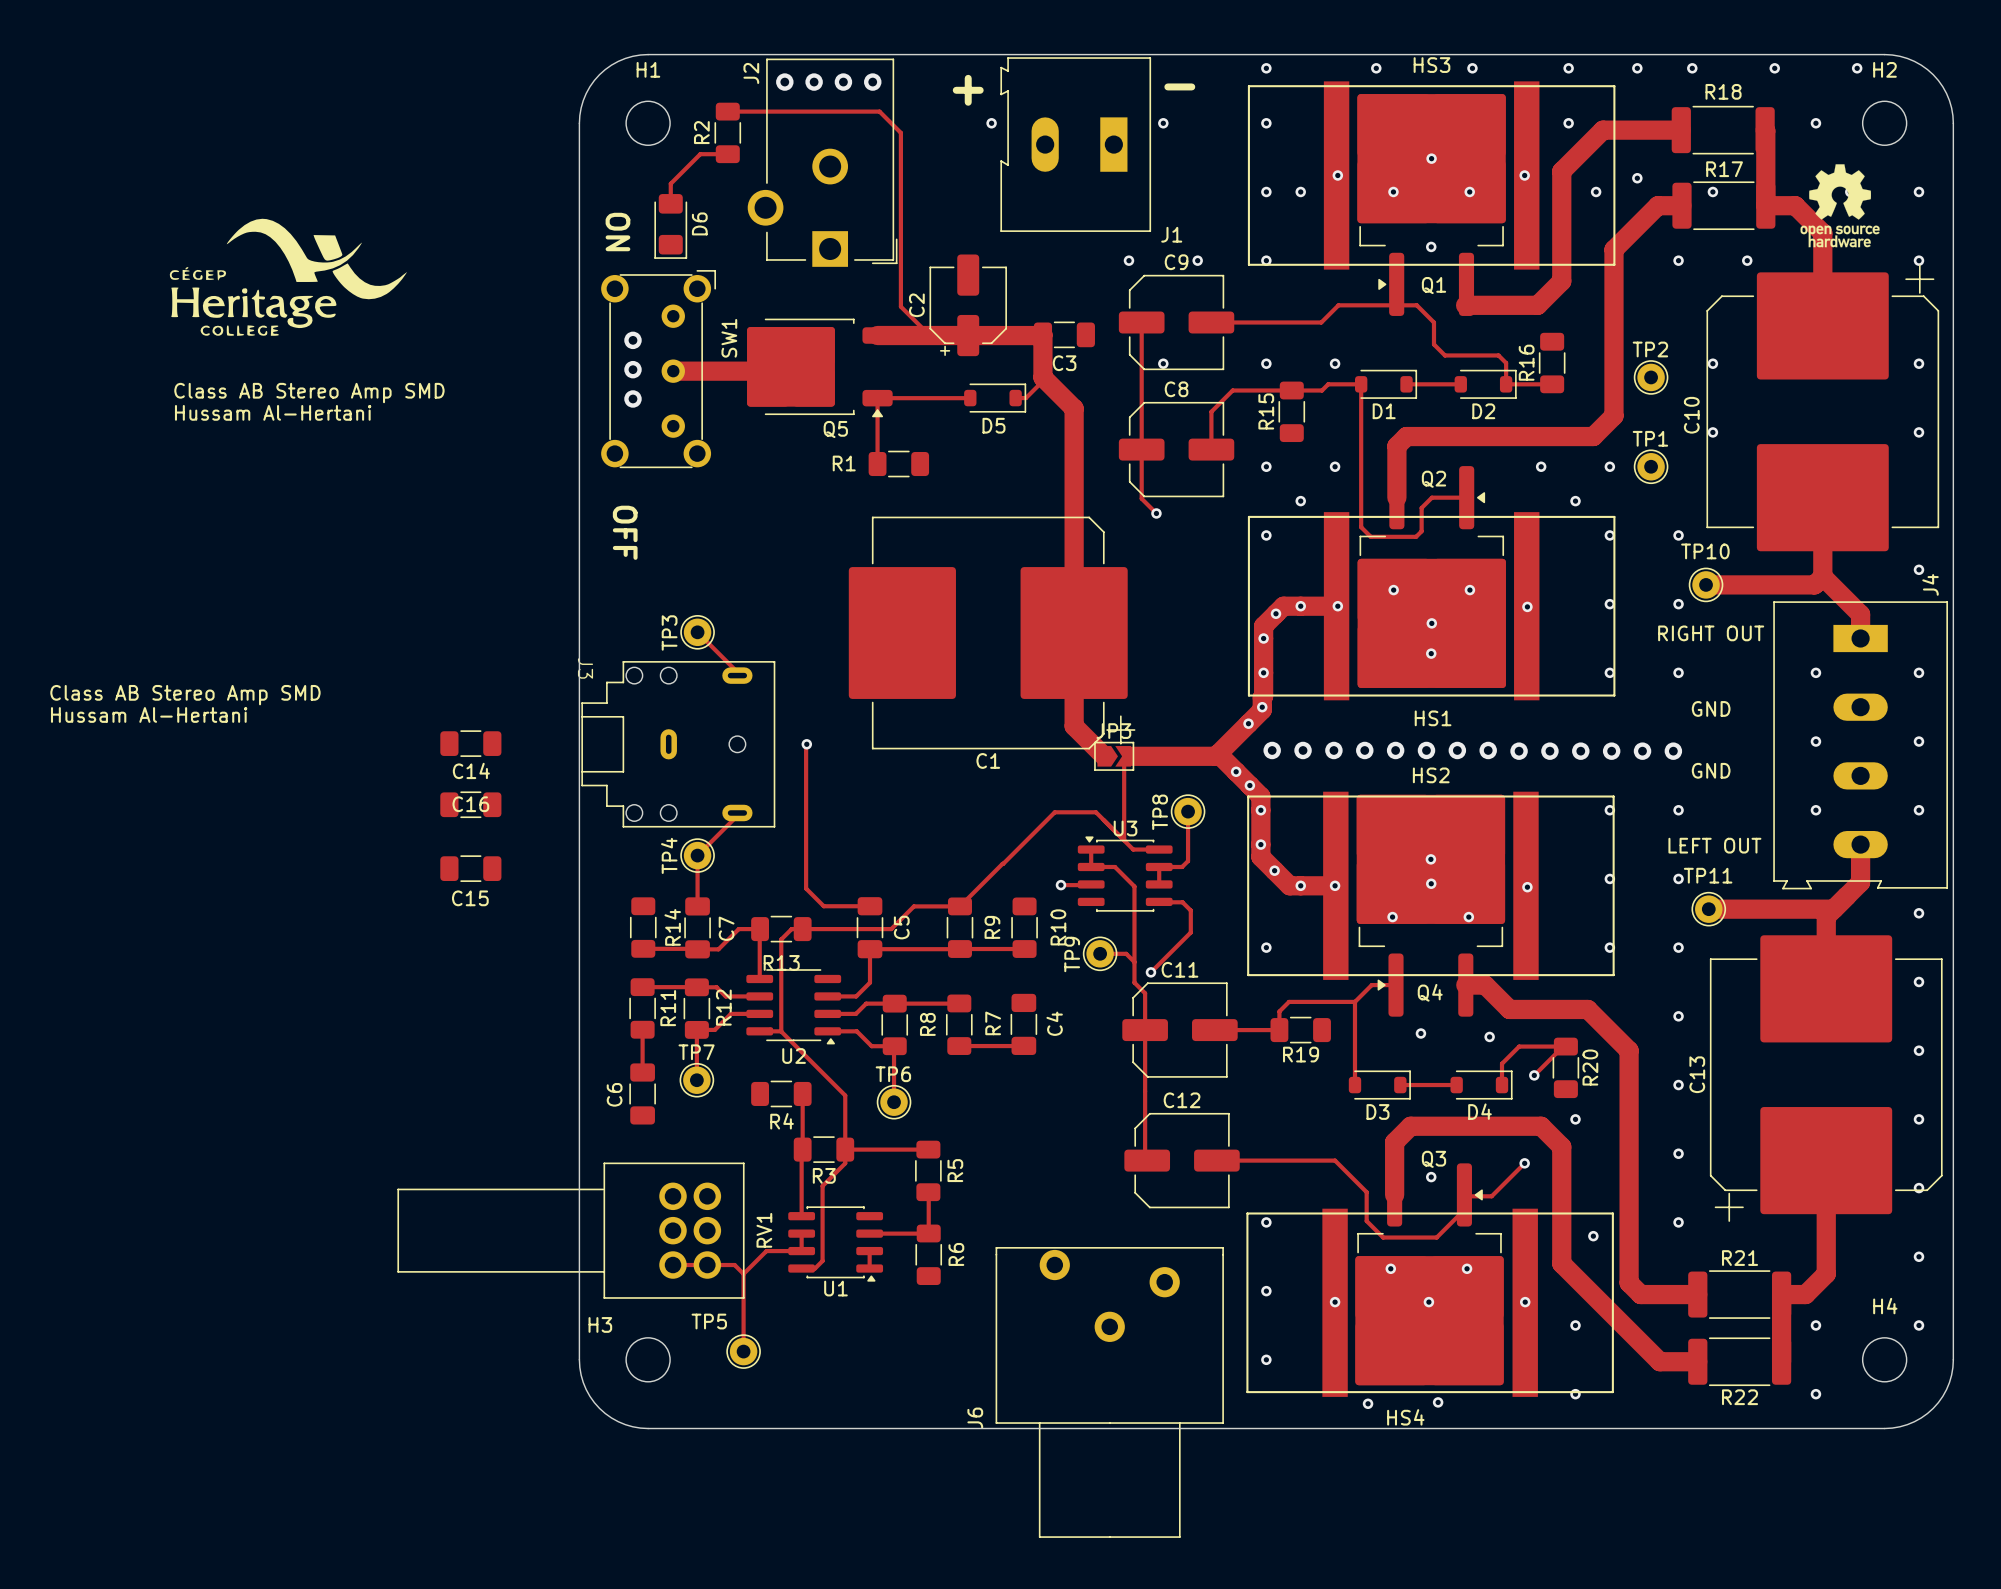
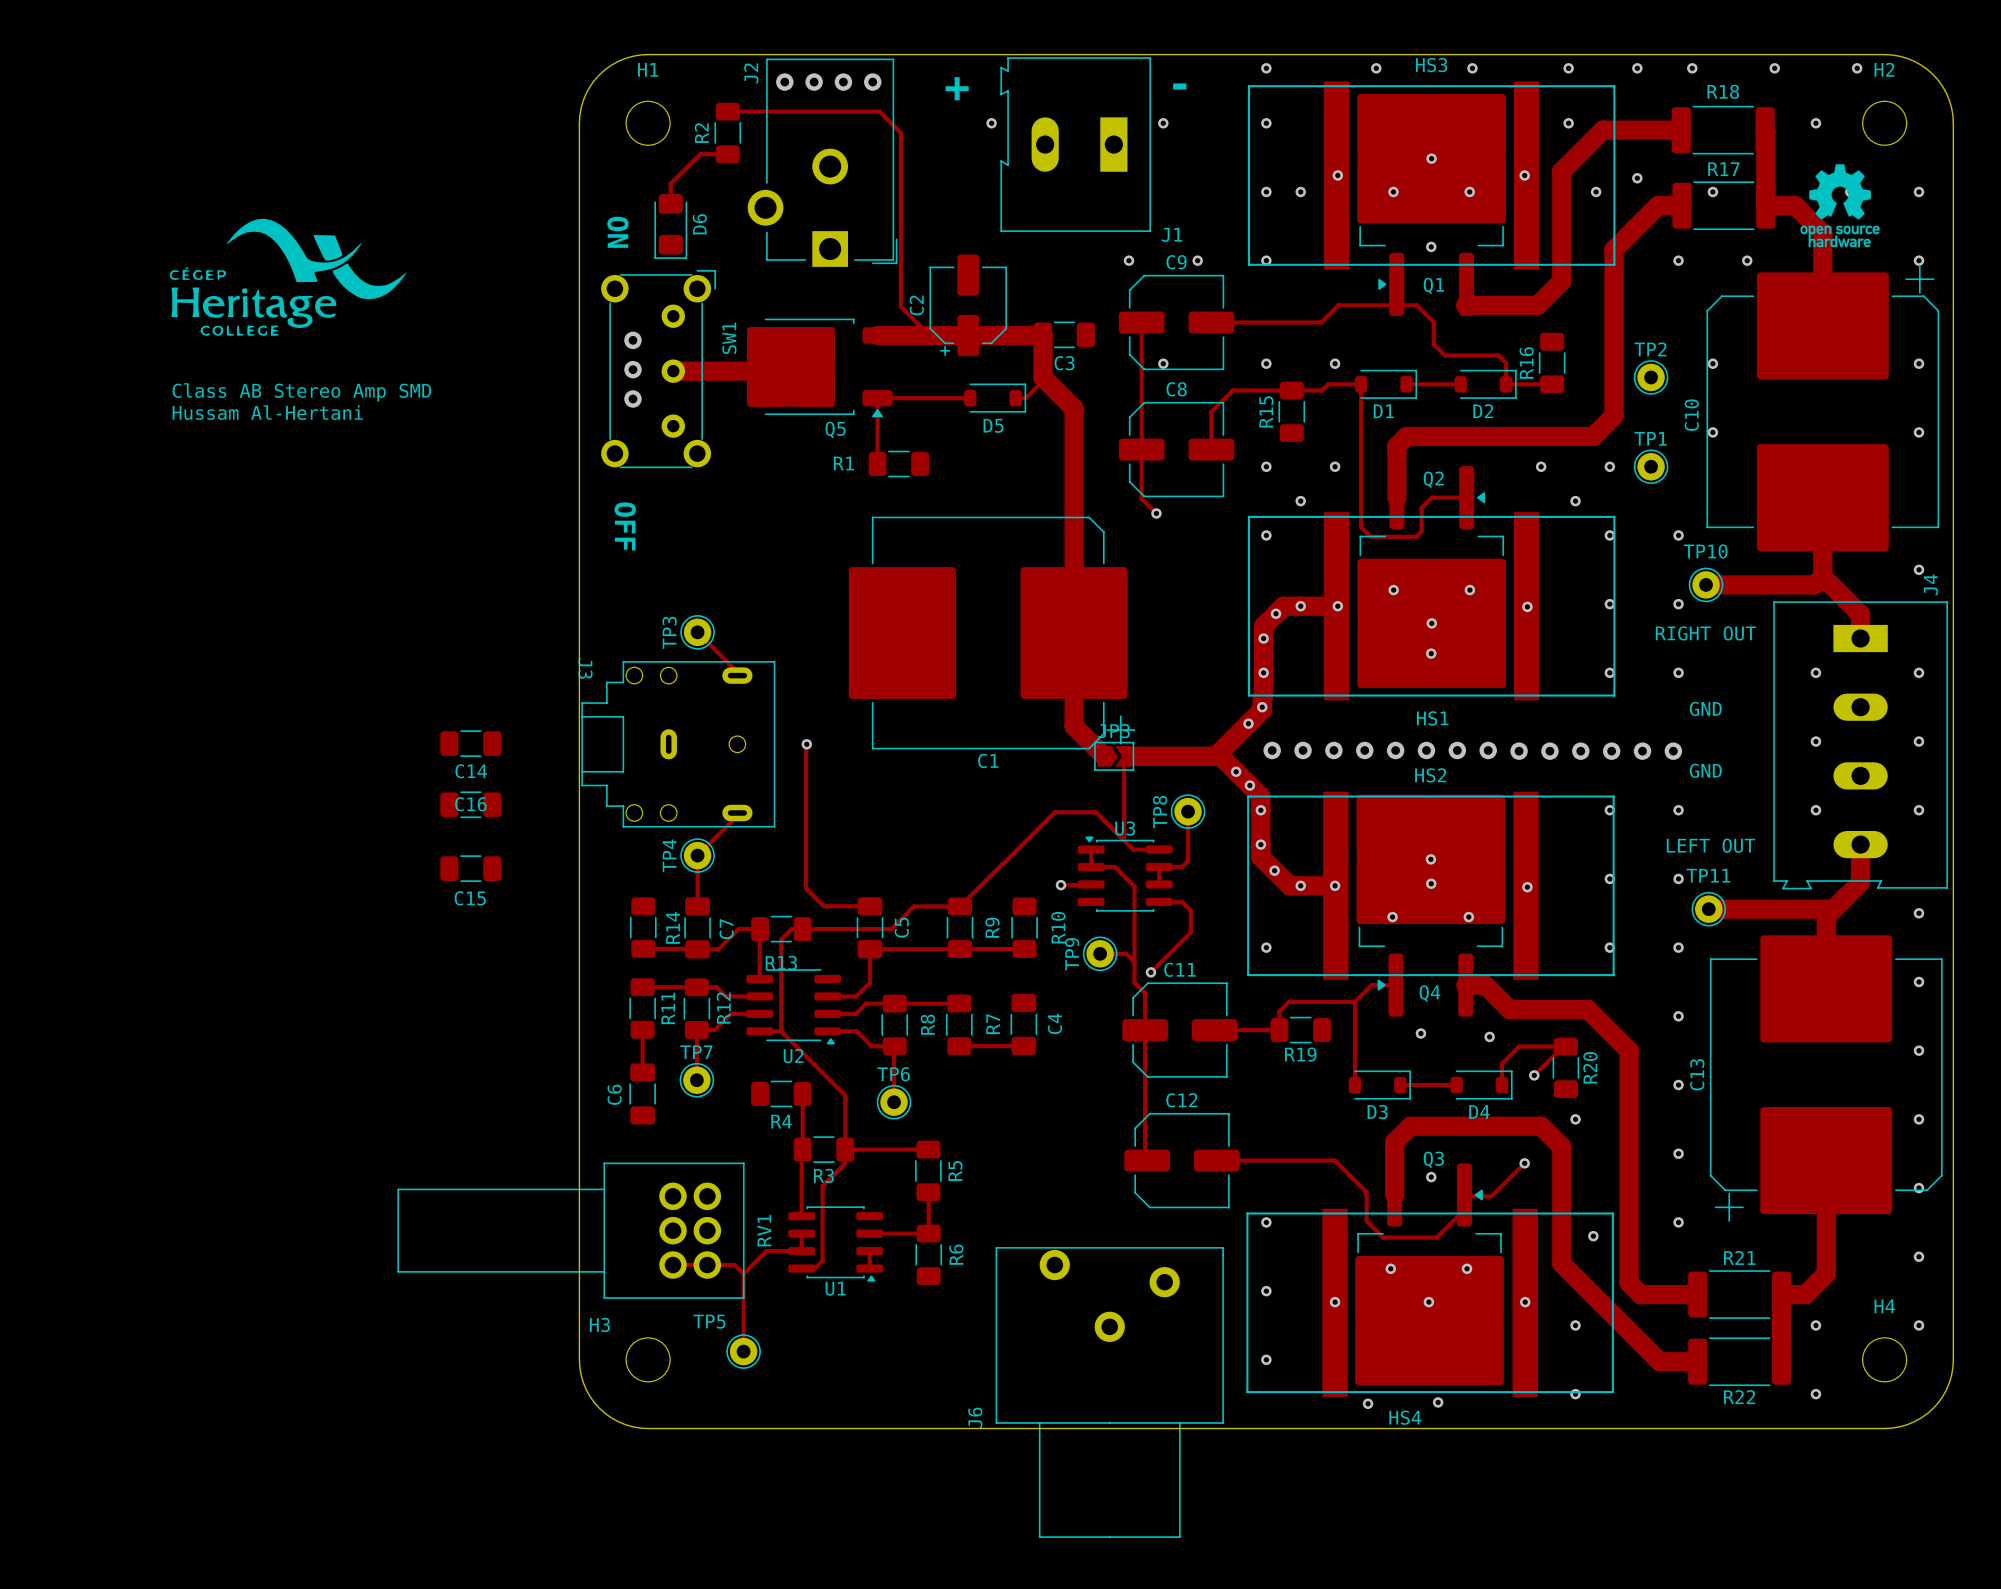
text: Class AB Stereo Amp SMD (185, 695) -> none
text: Hussam Al-Hertani (149, 714) -> none

